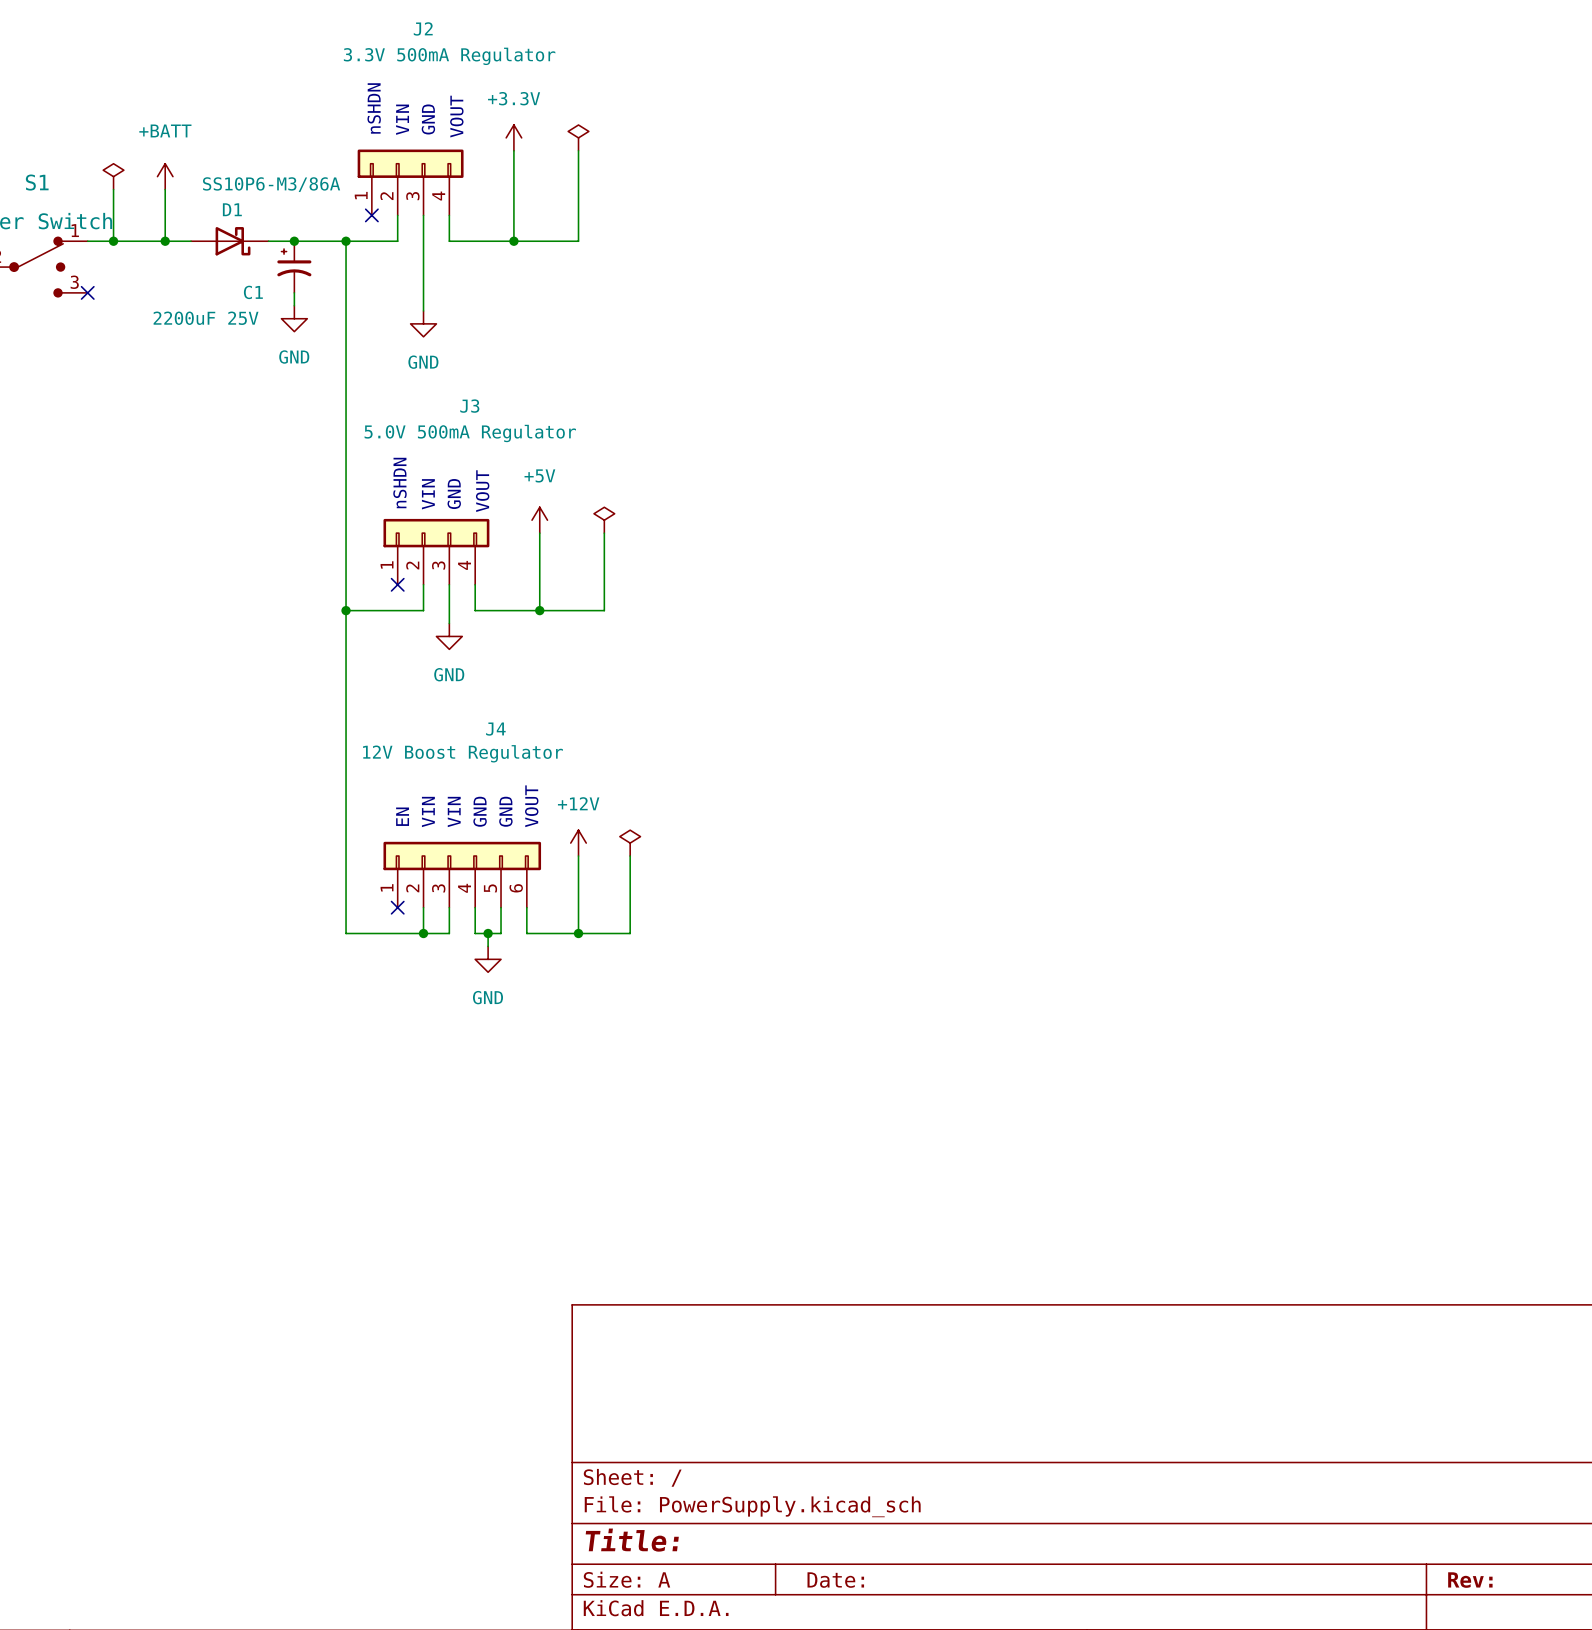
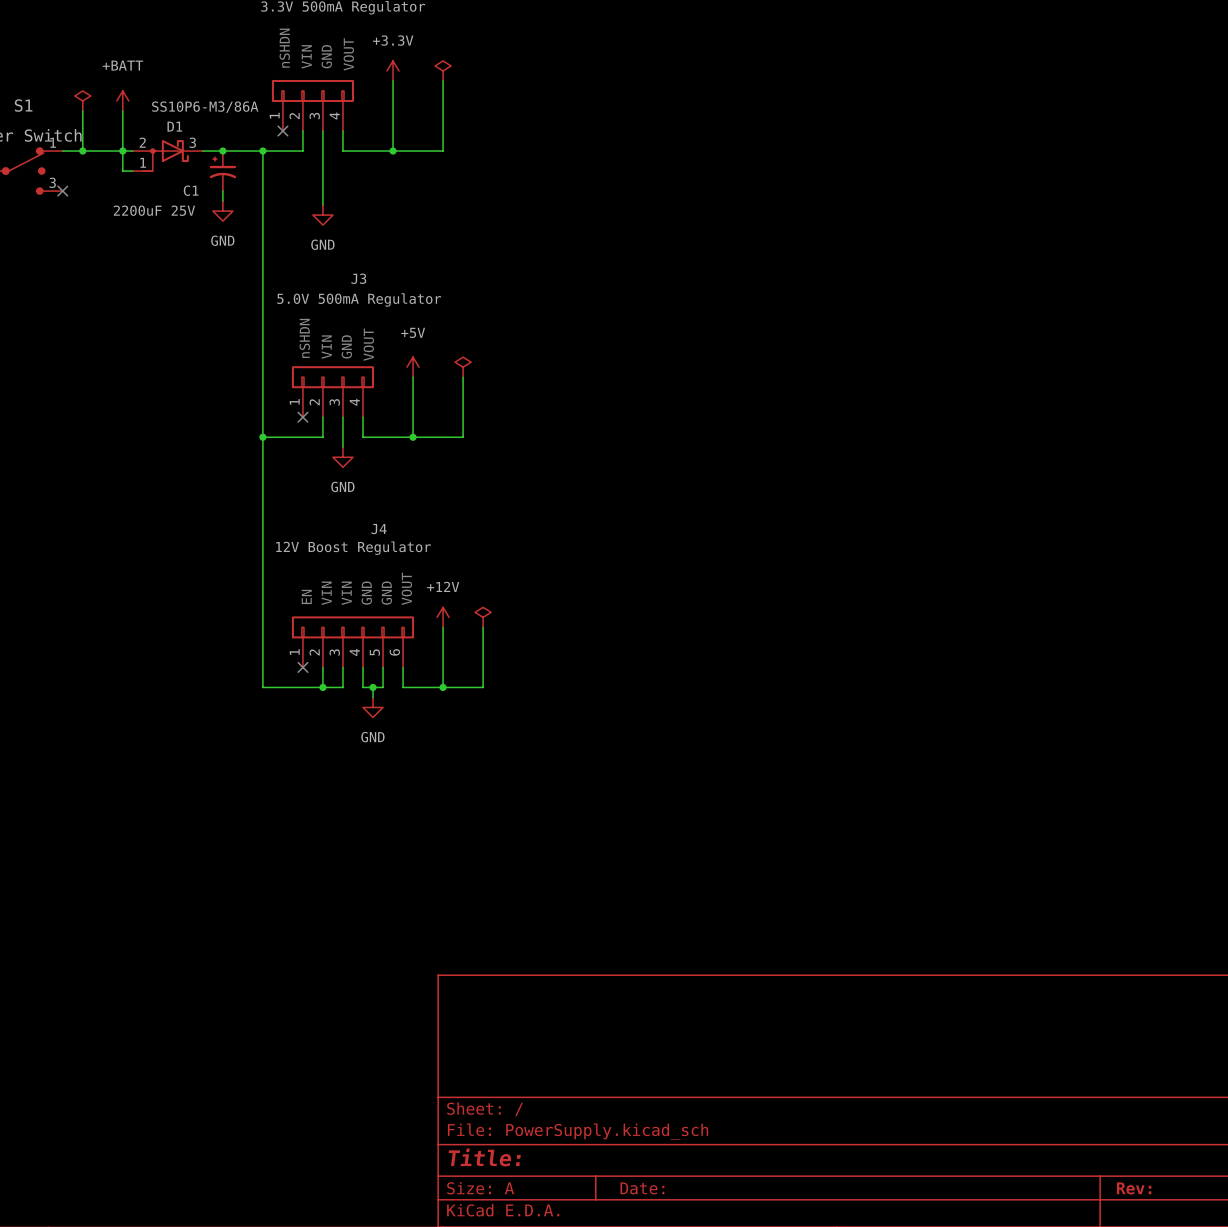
D1 symbol: [191, 227, 269, 256] -> [132, 140, 203, 172]
wire: none -> (122, 151) (122, 171) (132, 171)

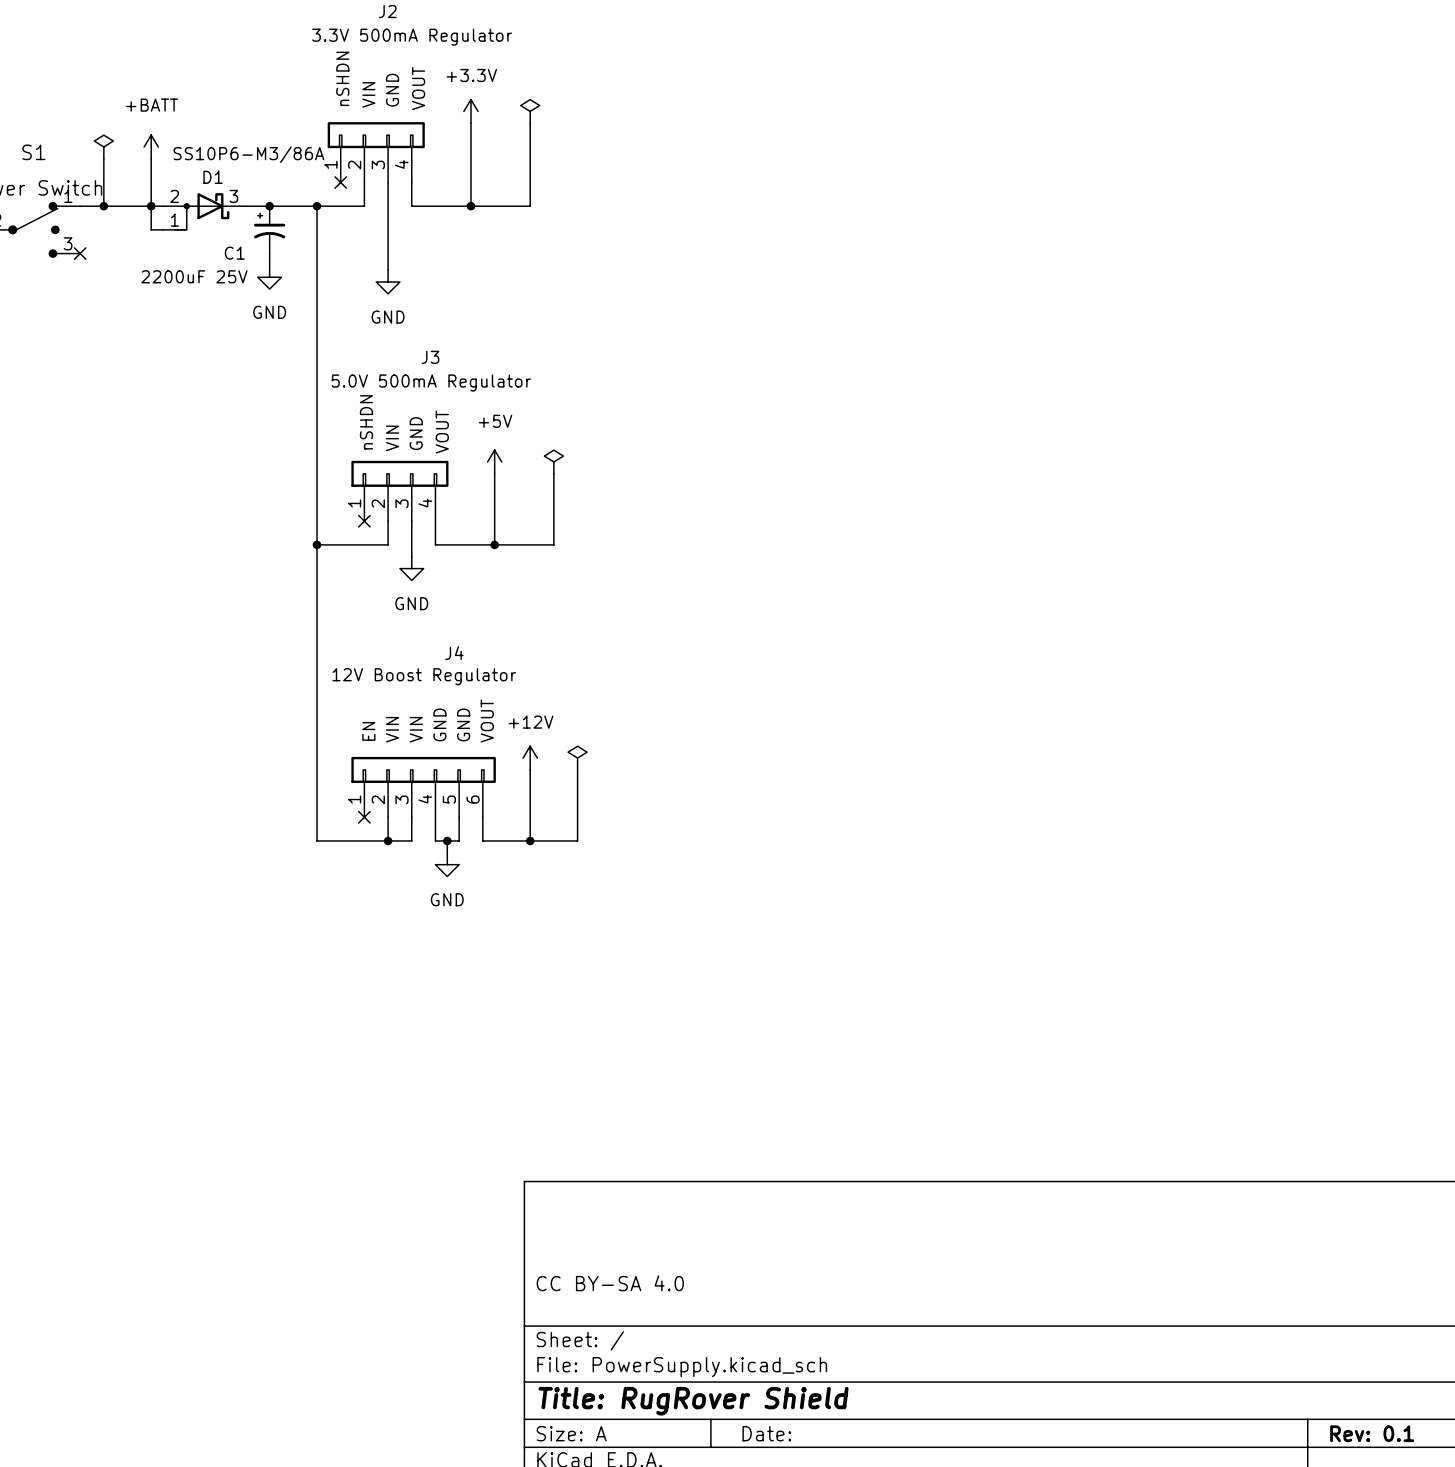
title block: none -> CC BY-SA 4.0 (610, 1283)
title block: Title: (484, 1157) -> Title: RugRover Shield (693, 1401)
title block: Rev: (1134, 1188) -> Rev: 0.1 (1372, 1433)

